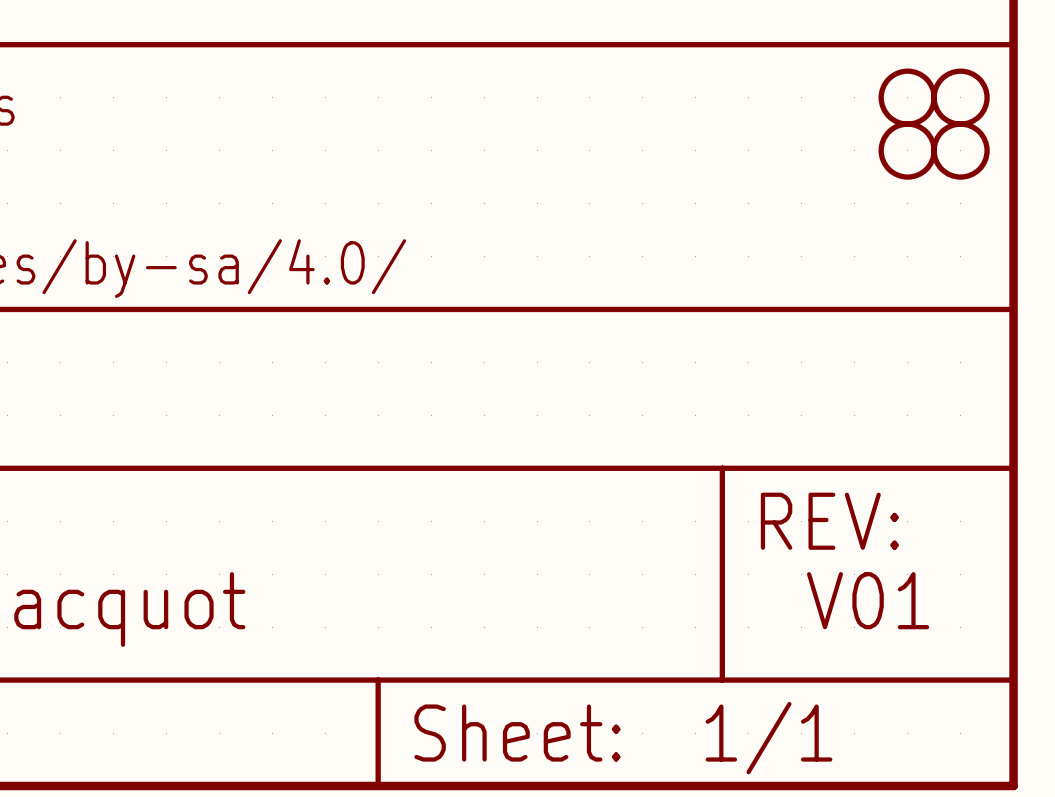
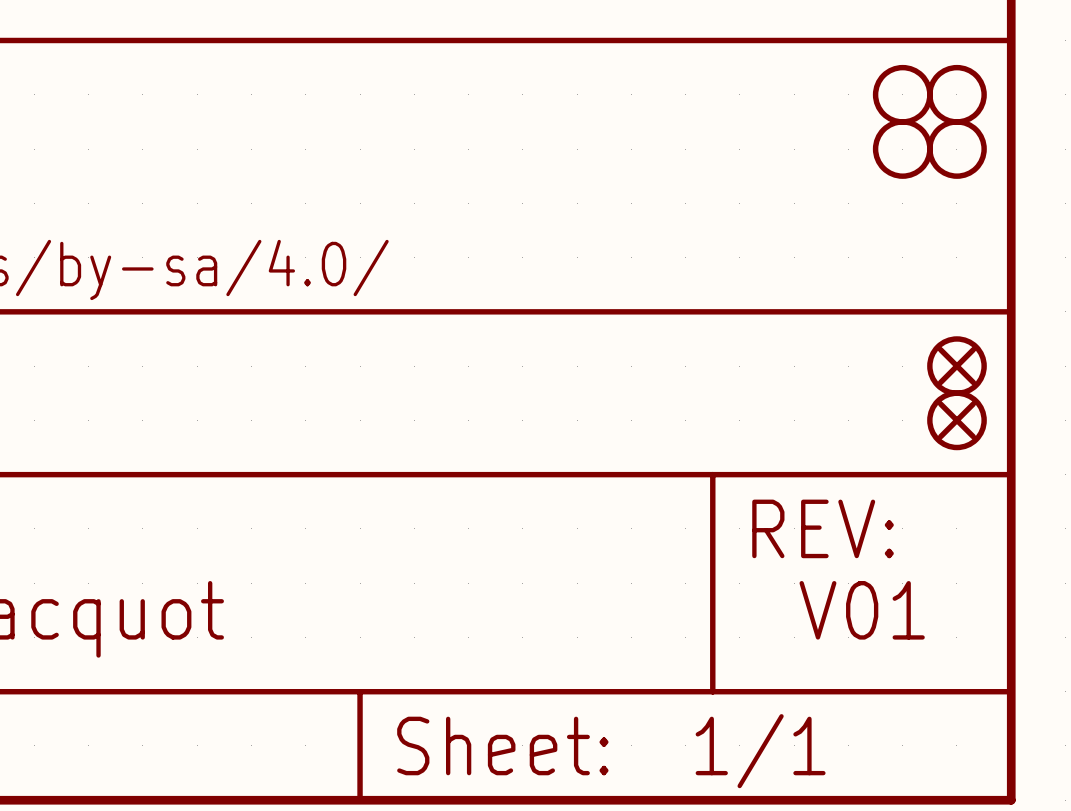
part: none -> (956, 366)
part: none -> (956, 420)

